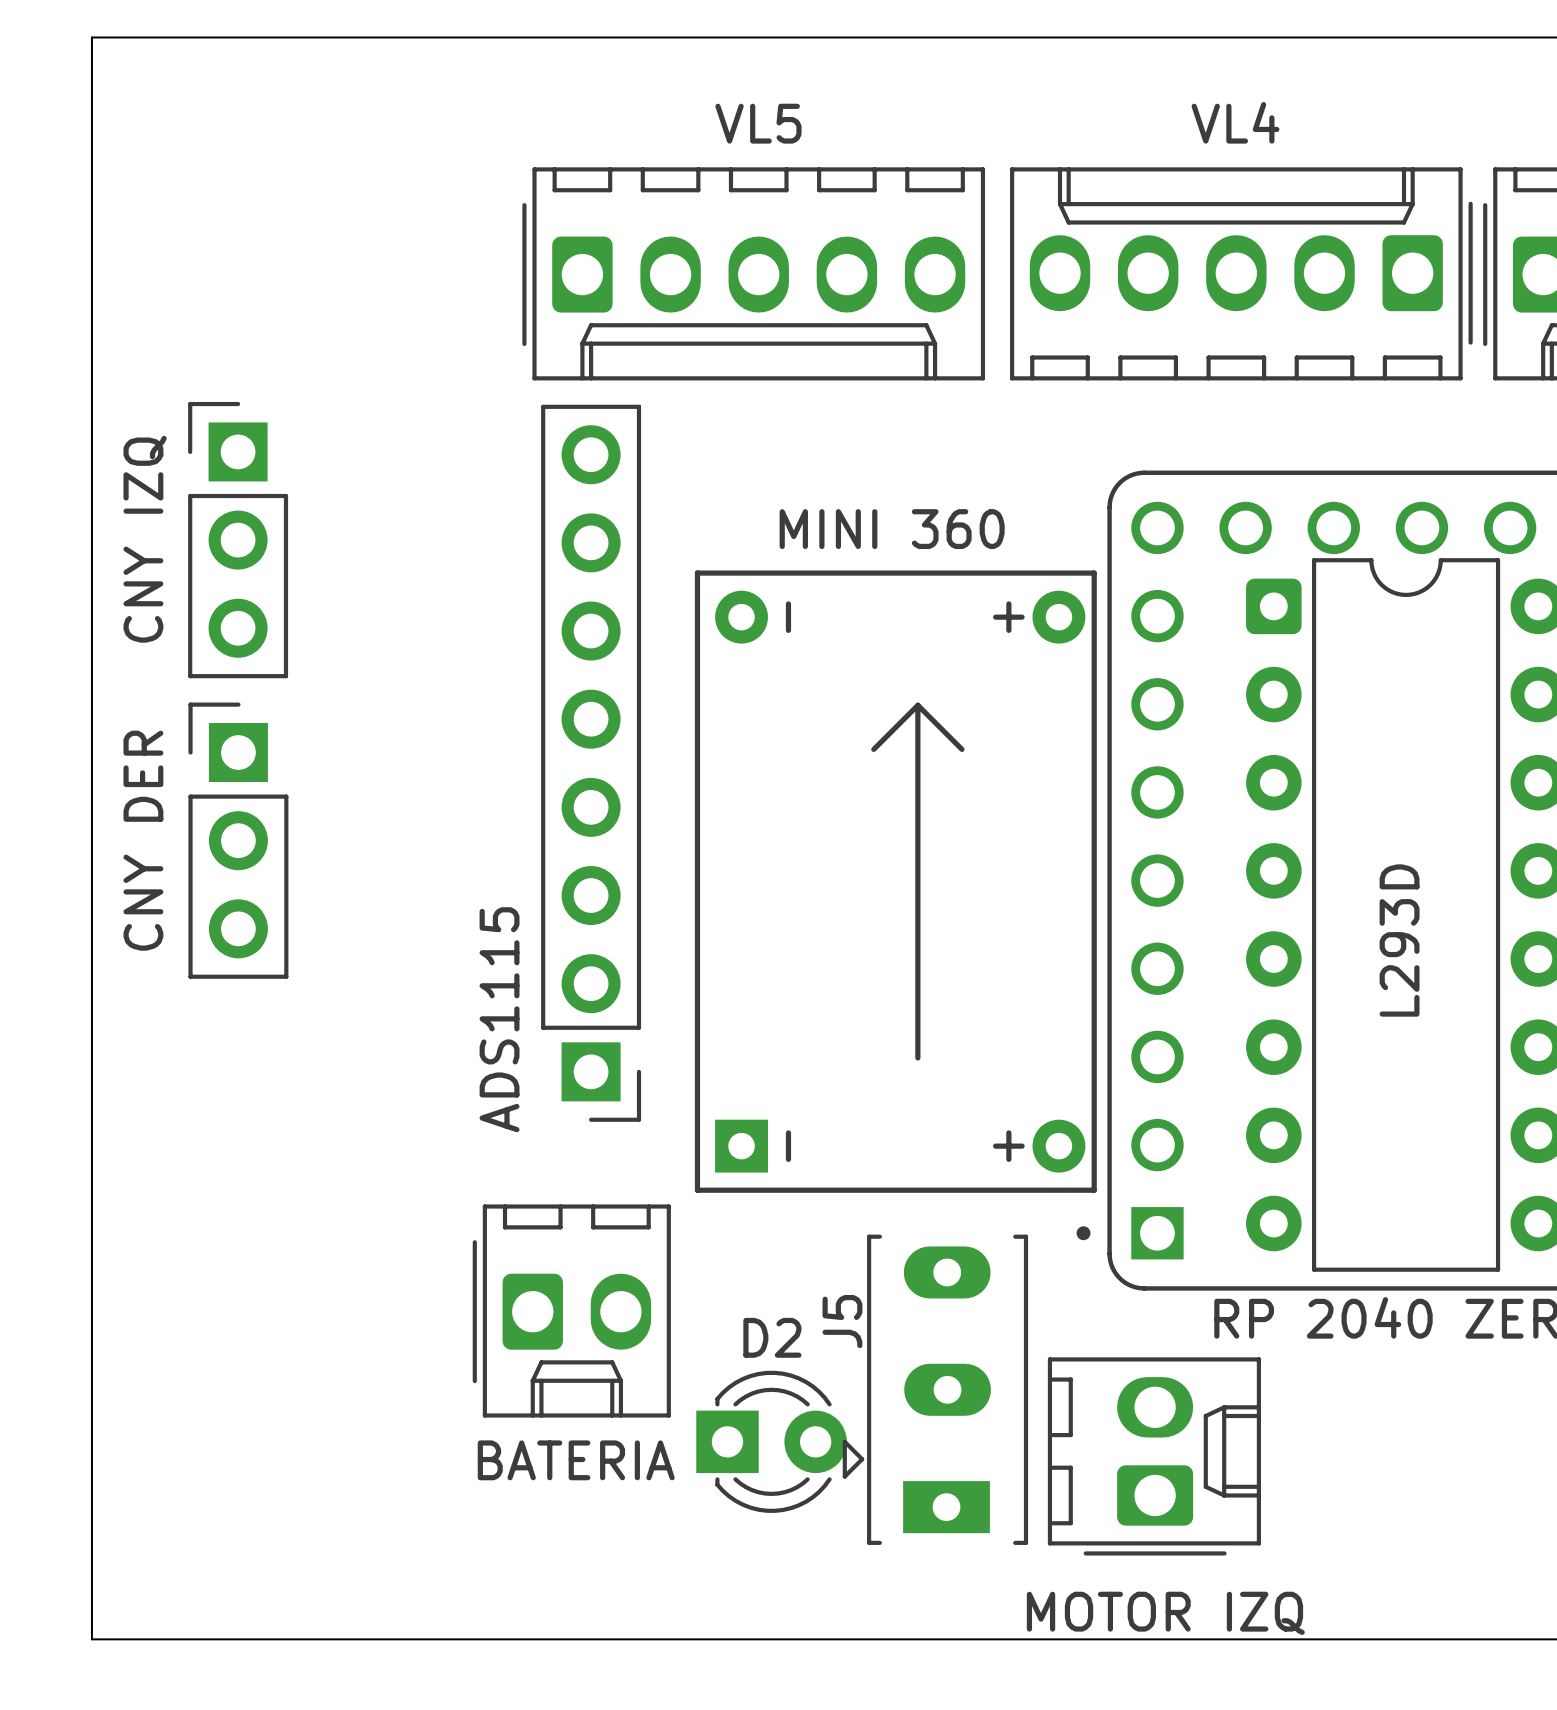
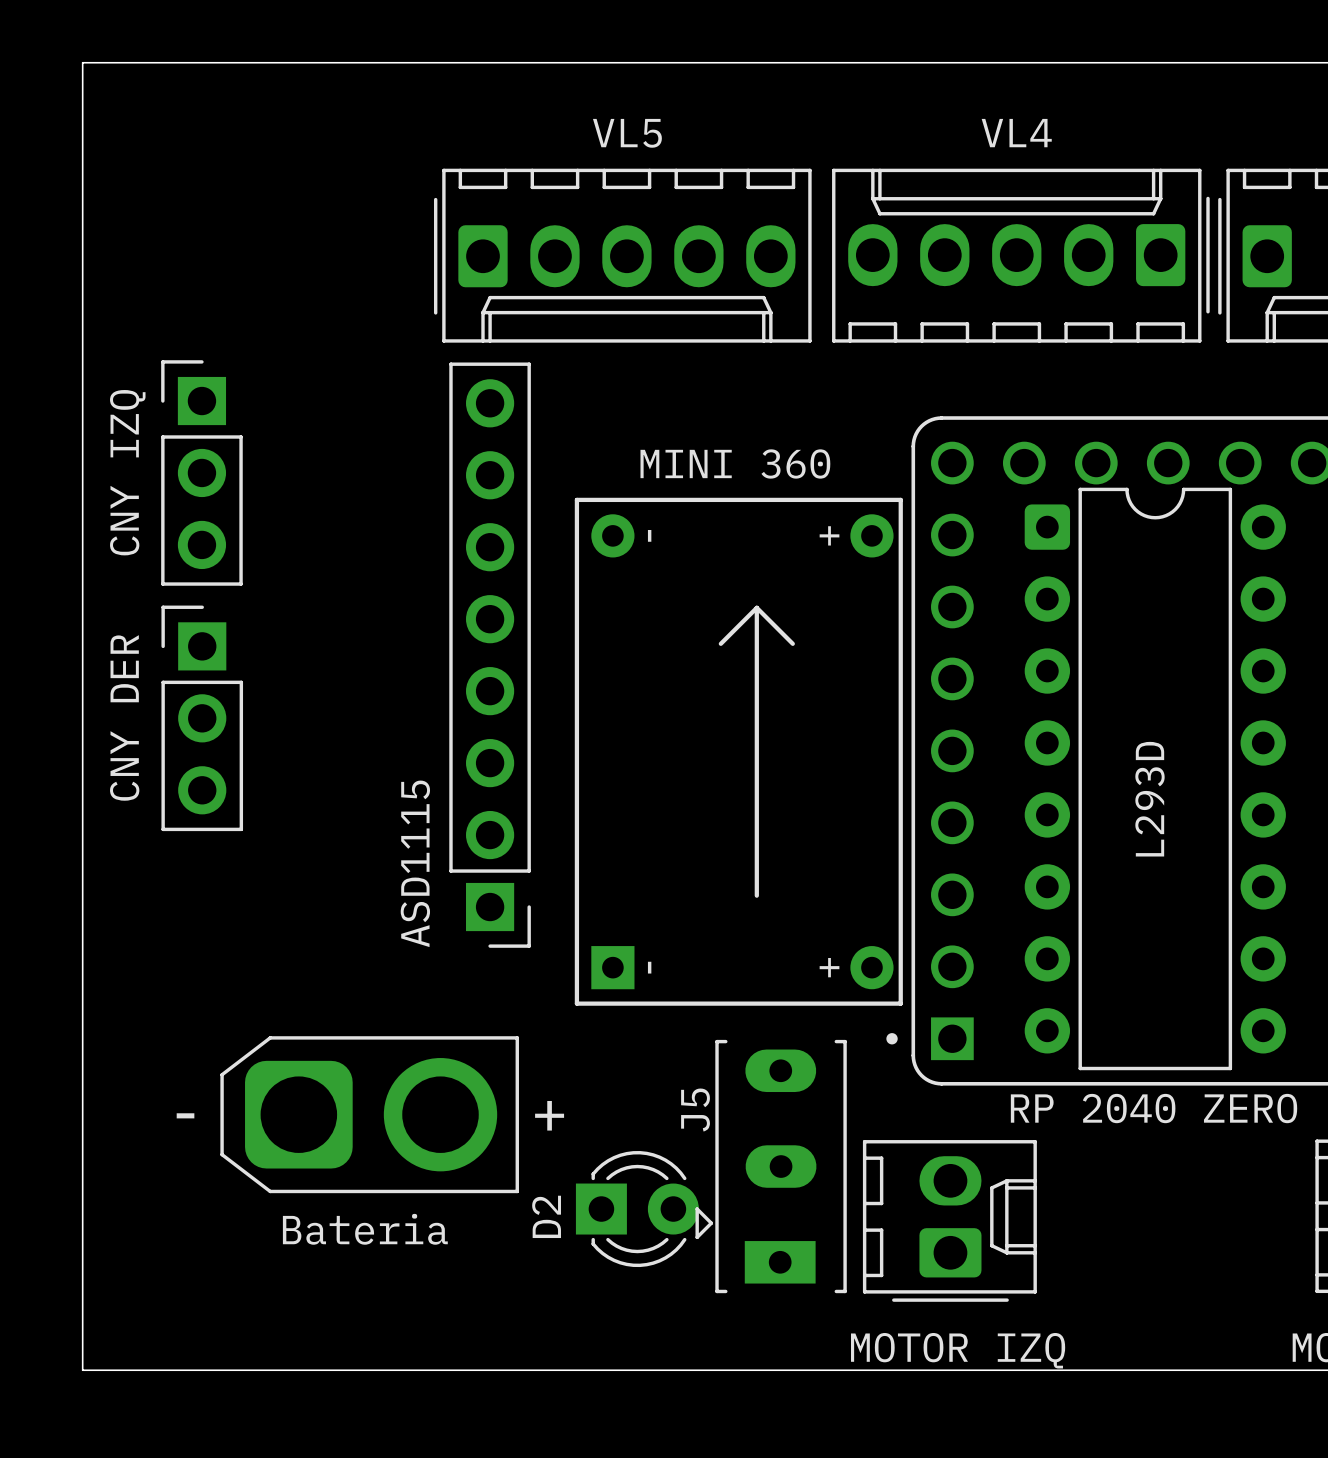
ADS1115 name: ADS1115 (499, 1019) -> ASD1115 (415, 863)
BATERIA: (571, 1311) -> none
Bateria: none -> (369, 1114)
D2 name rotation: 0° (772, 1337) -> 90° counterclockwise (546, 1216)
D2 name position: D2 (772, 1337) -> D2 (546, 1216)

